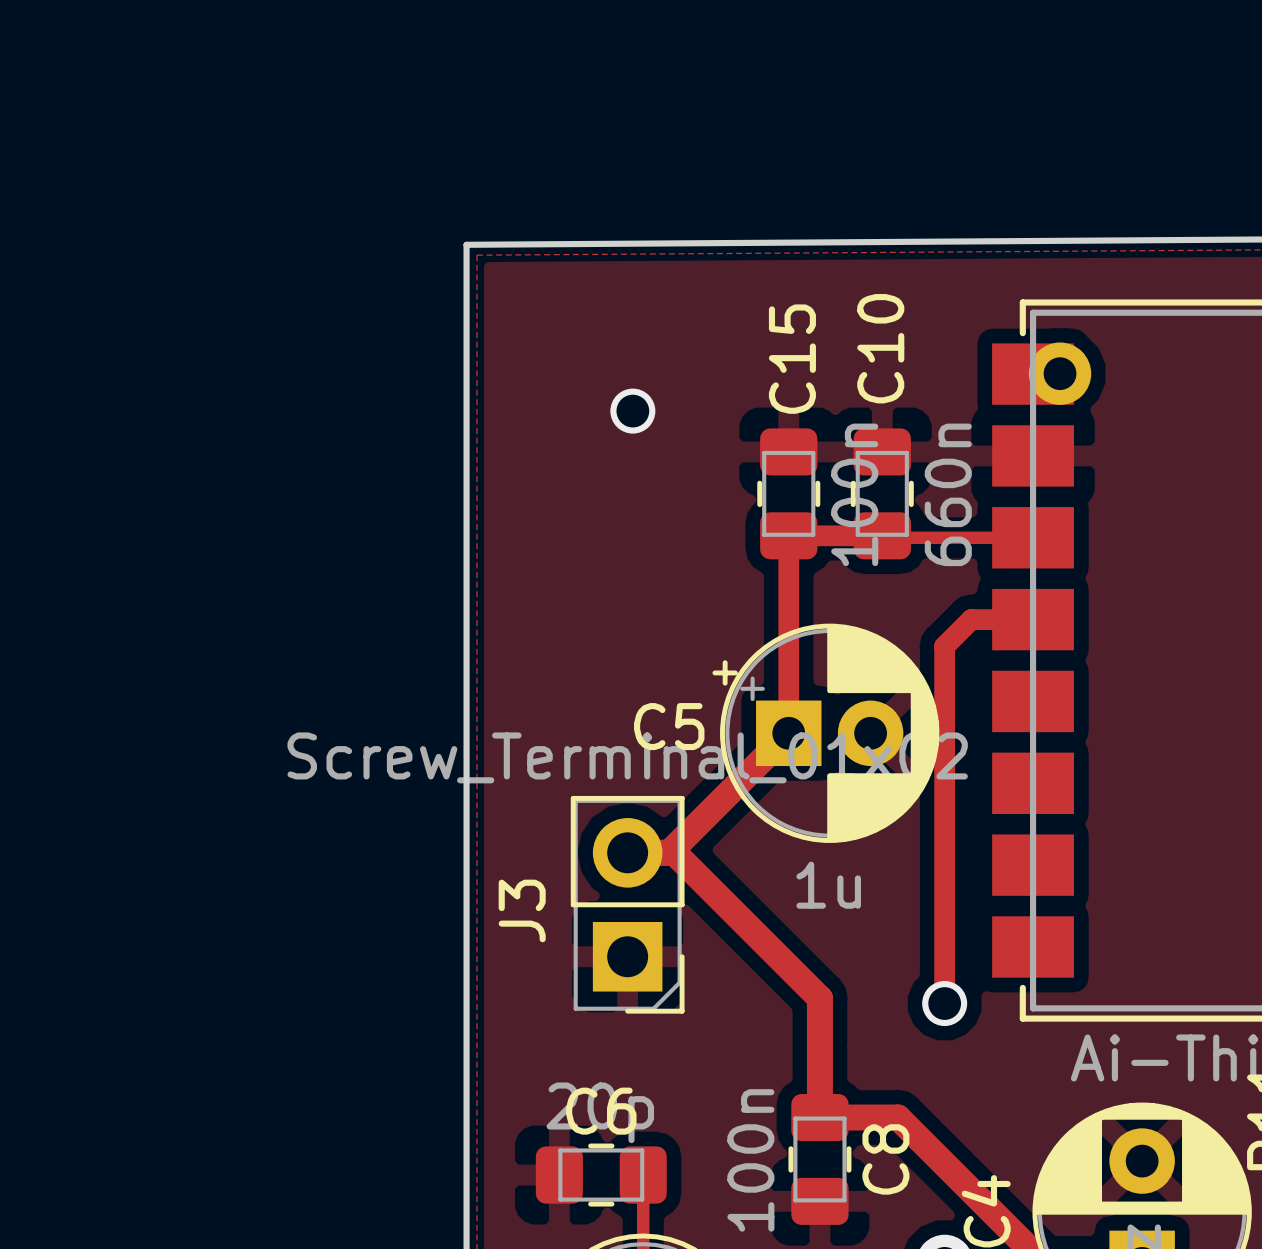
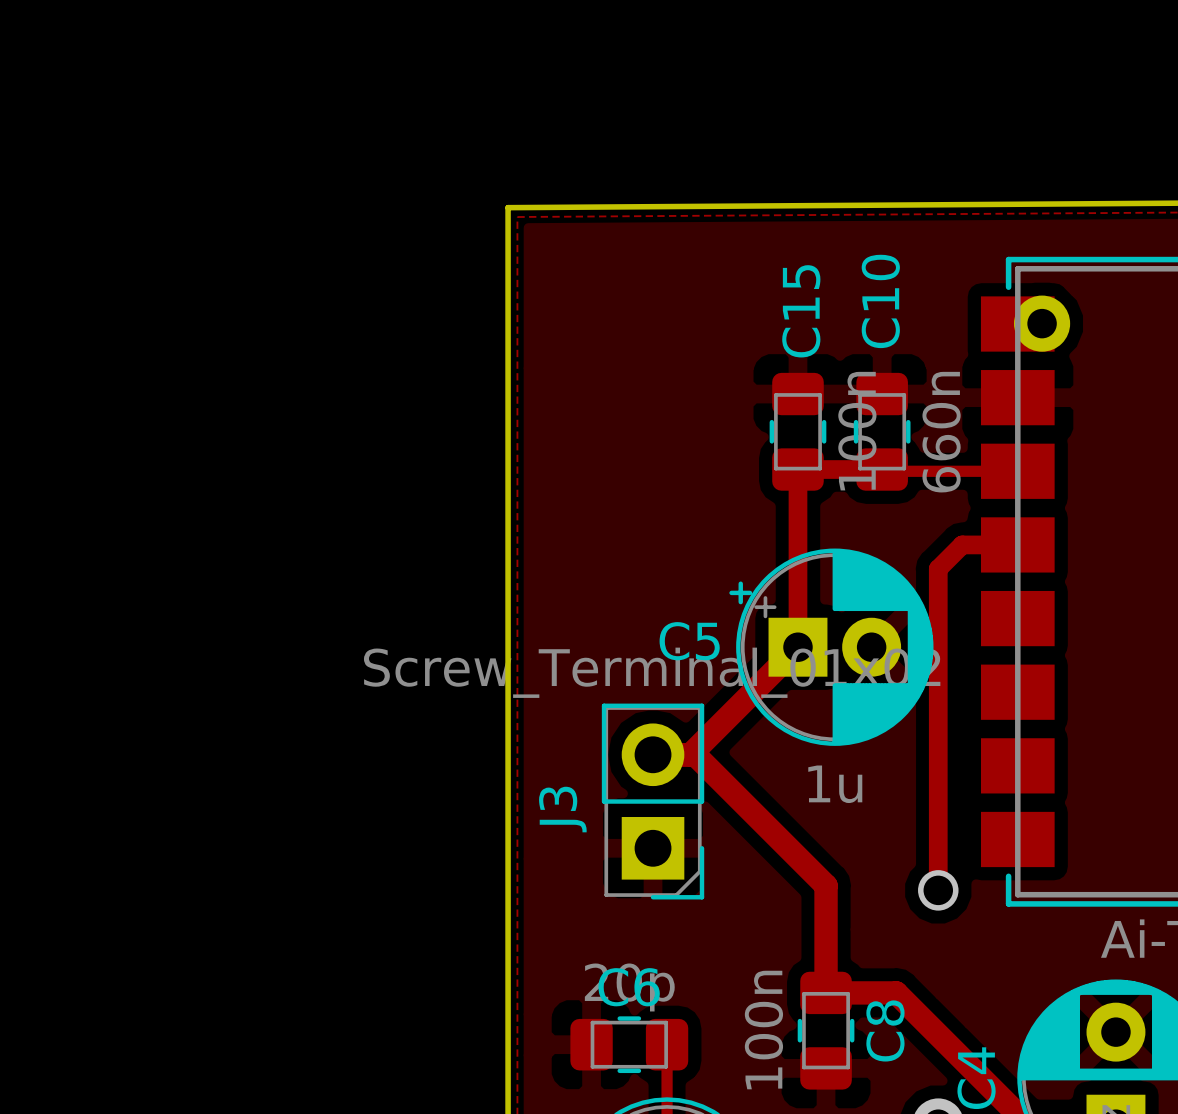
via: (632, 411) -> none

